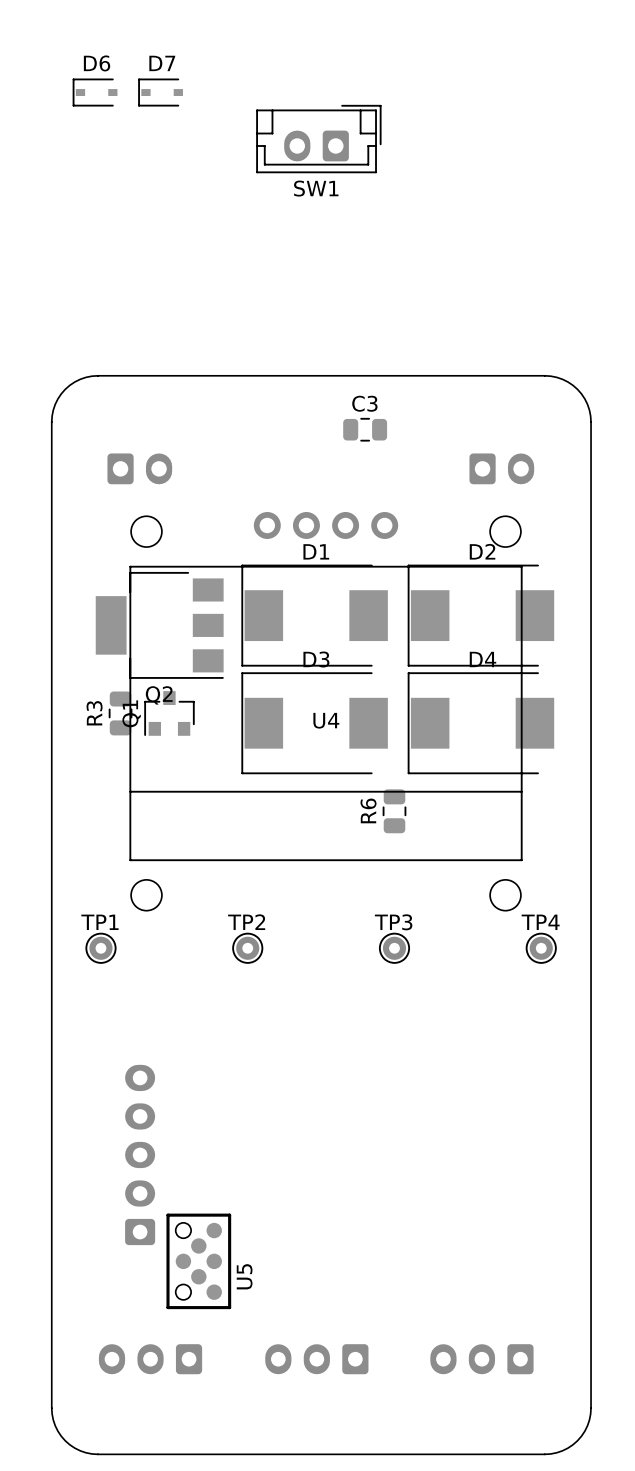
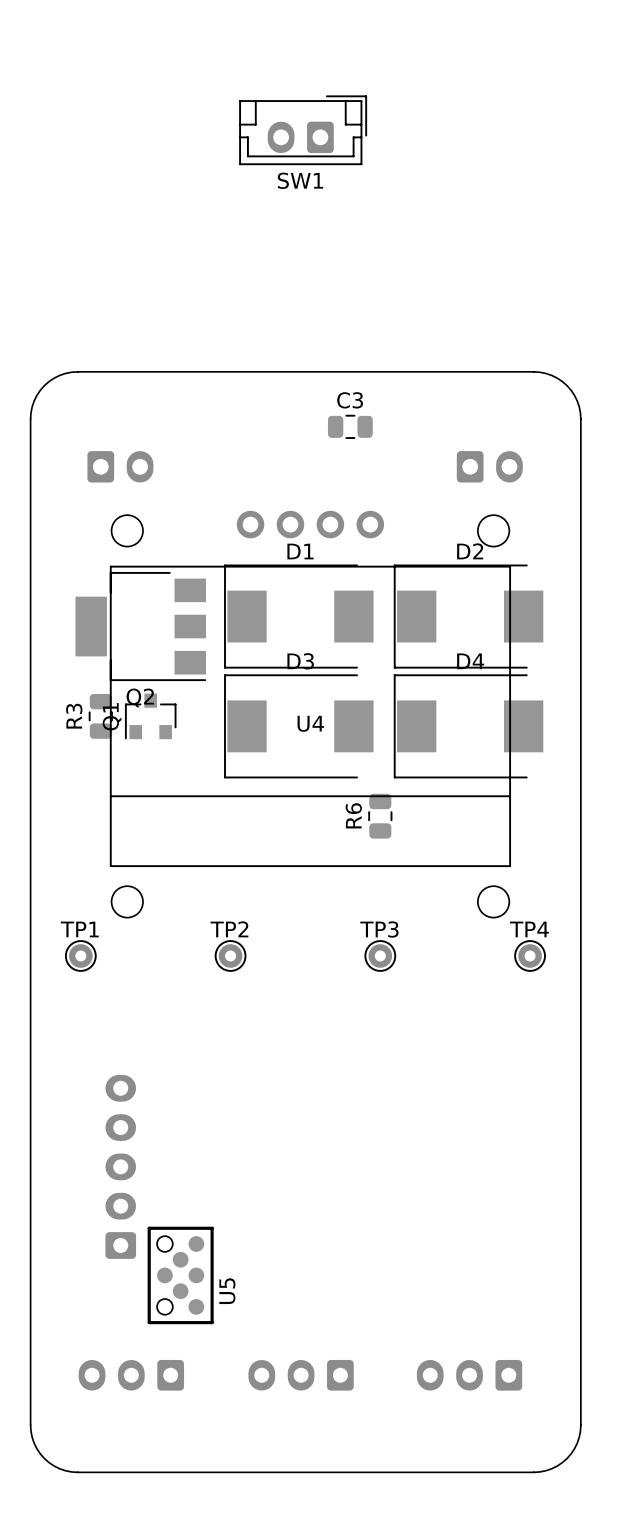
D6: (95, 92) -> none
D7: (160, 92) -> none

